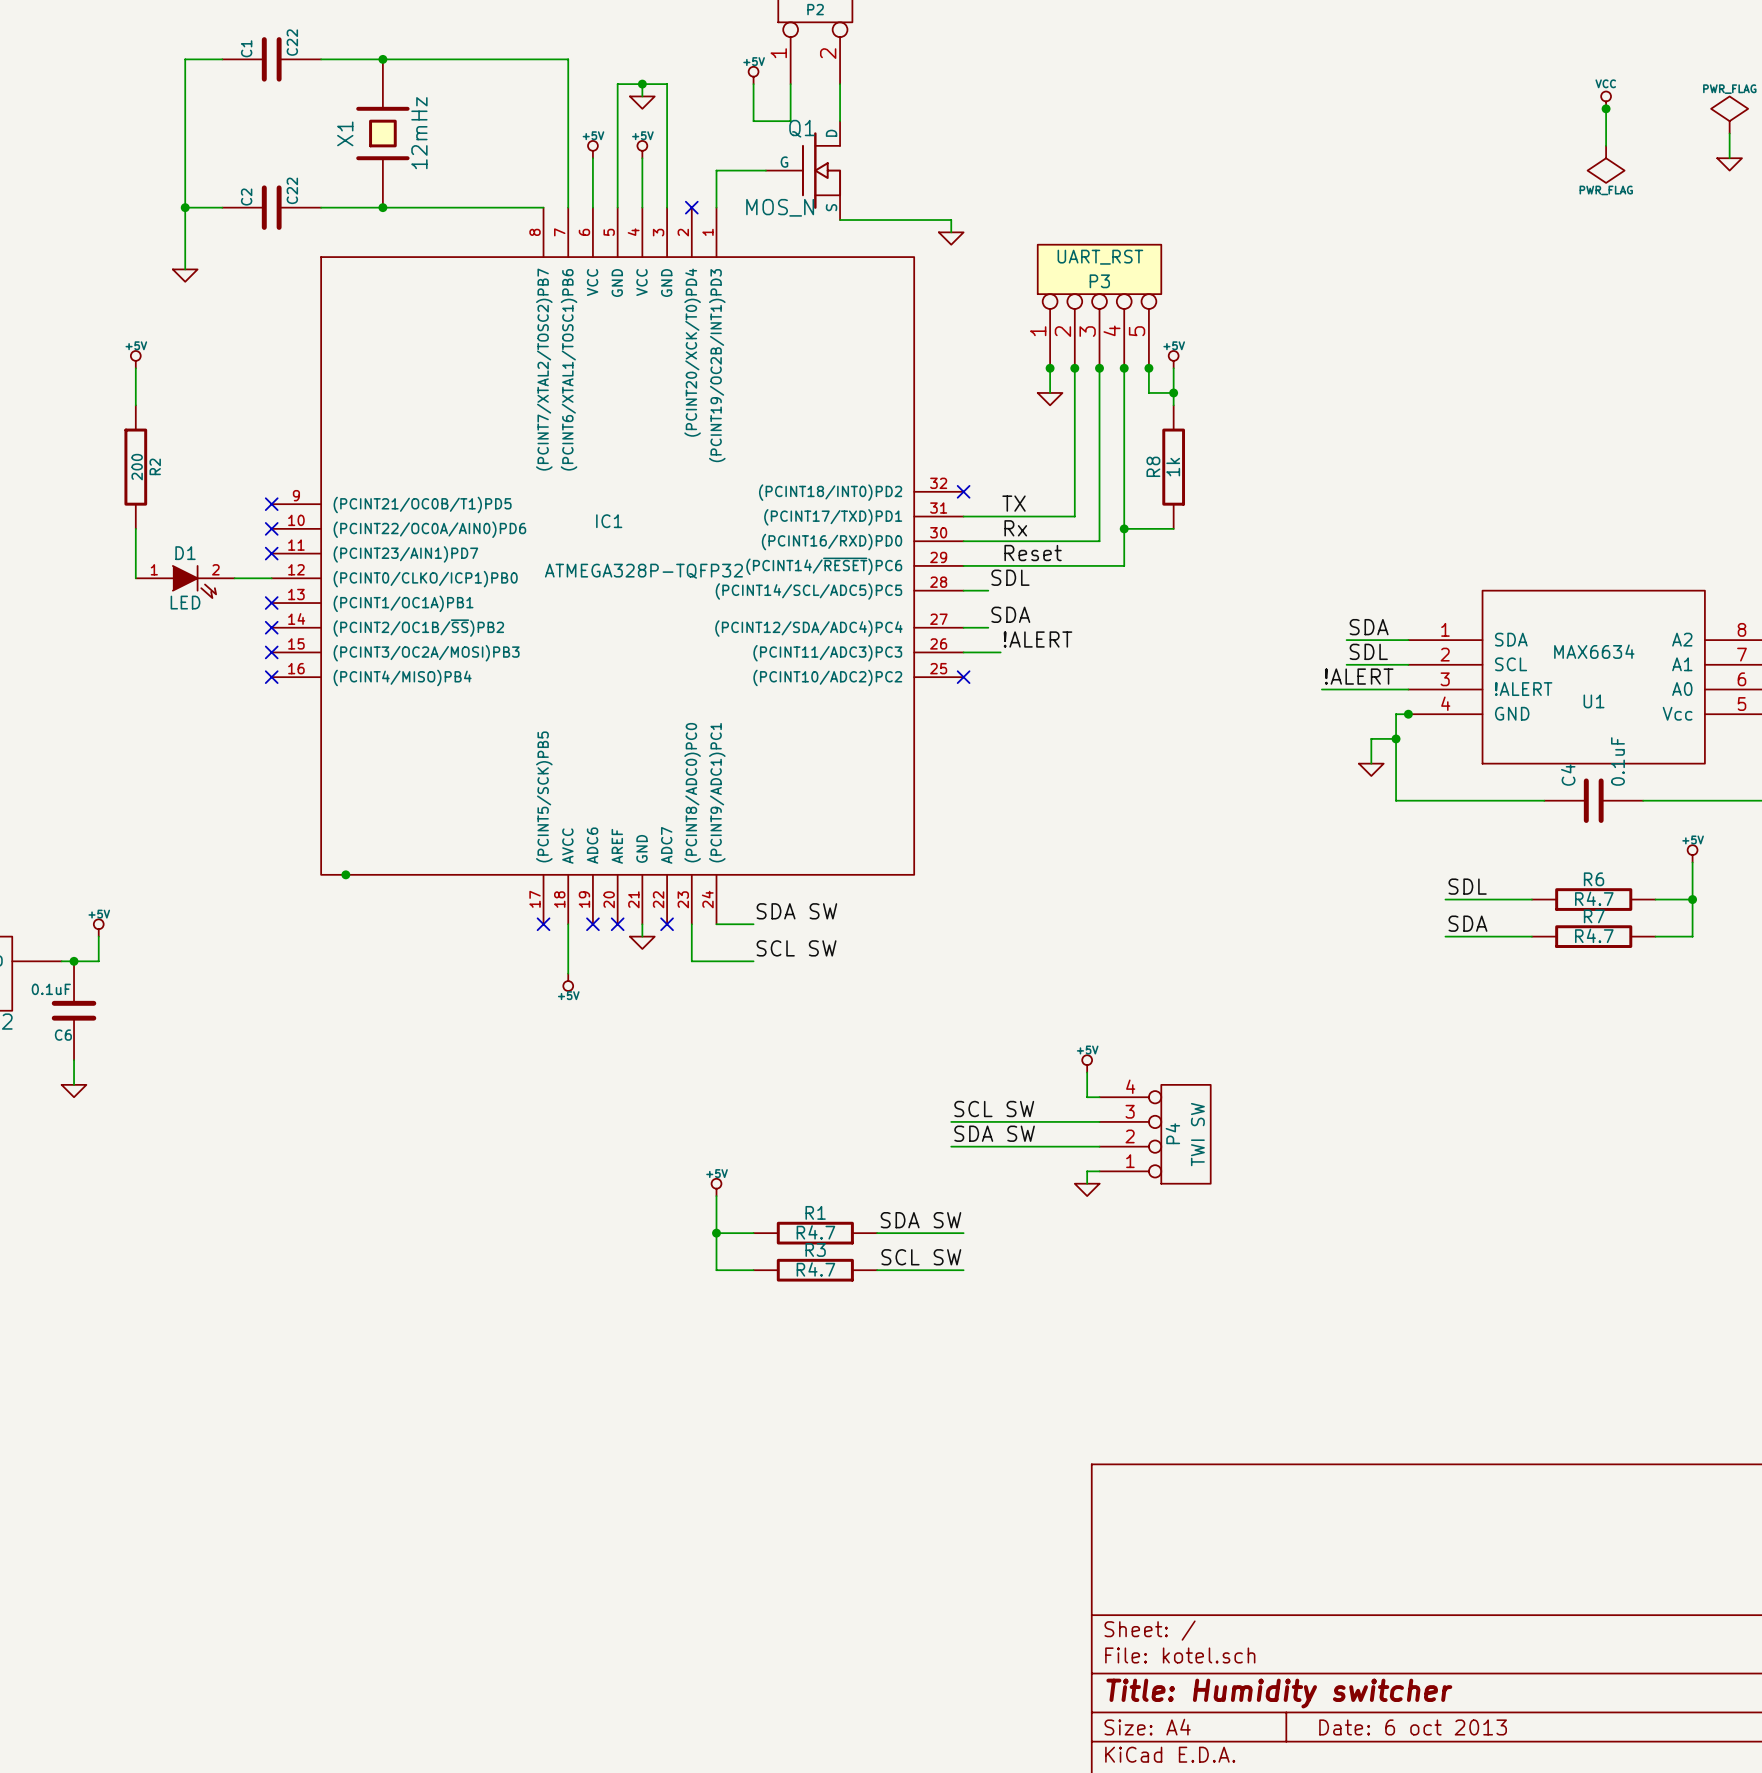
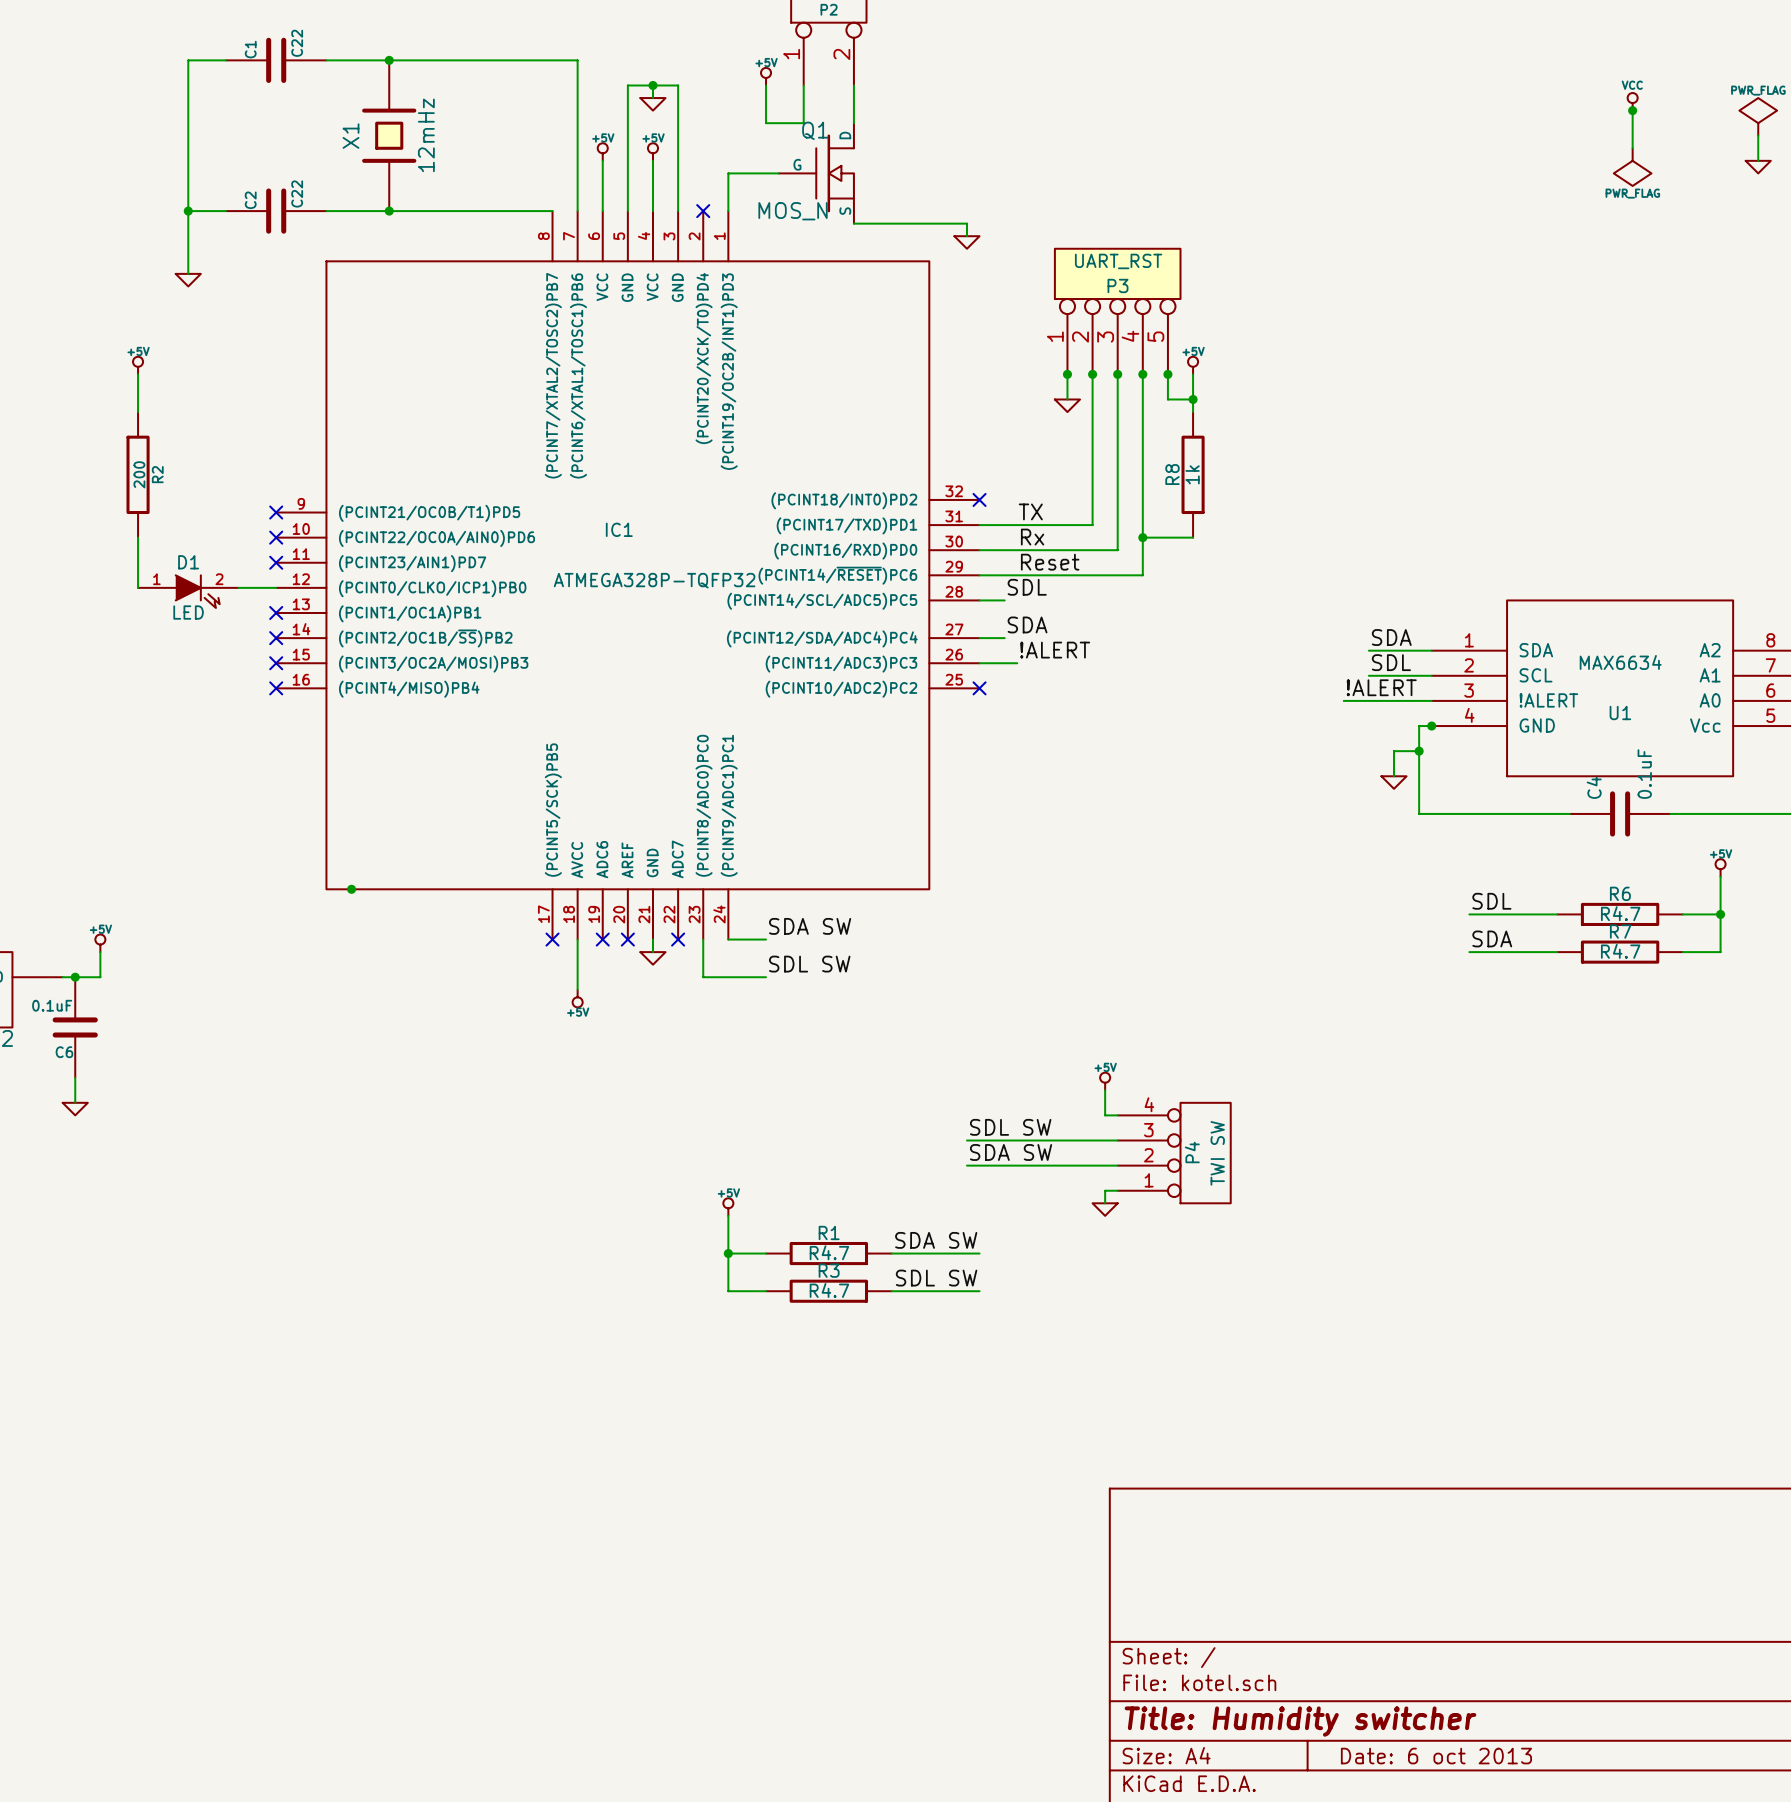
label: SCL SW (796, 948) -> SDL SW (809, 964)
label: SCL SW (994, 1109) -> SDL SW (1010, 1127)
label: SCL SW (921, 1257) -> SDL SW (936, 1278)

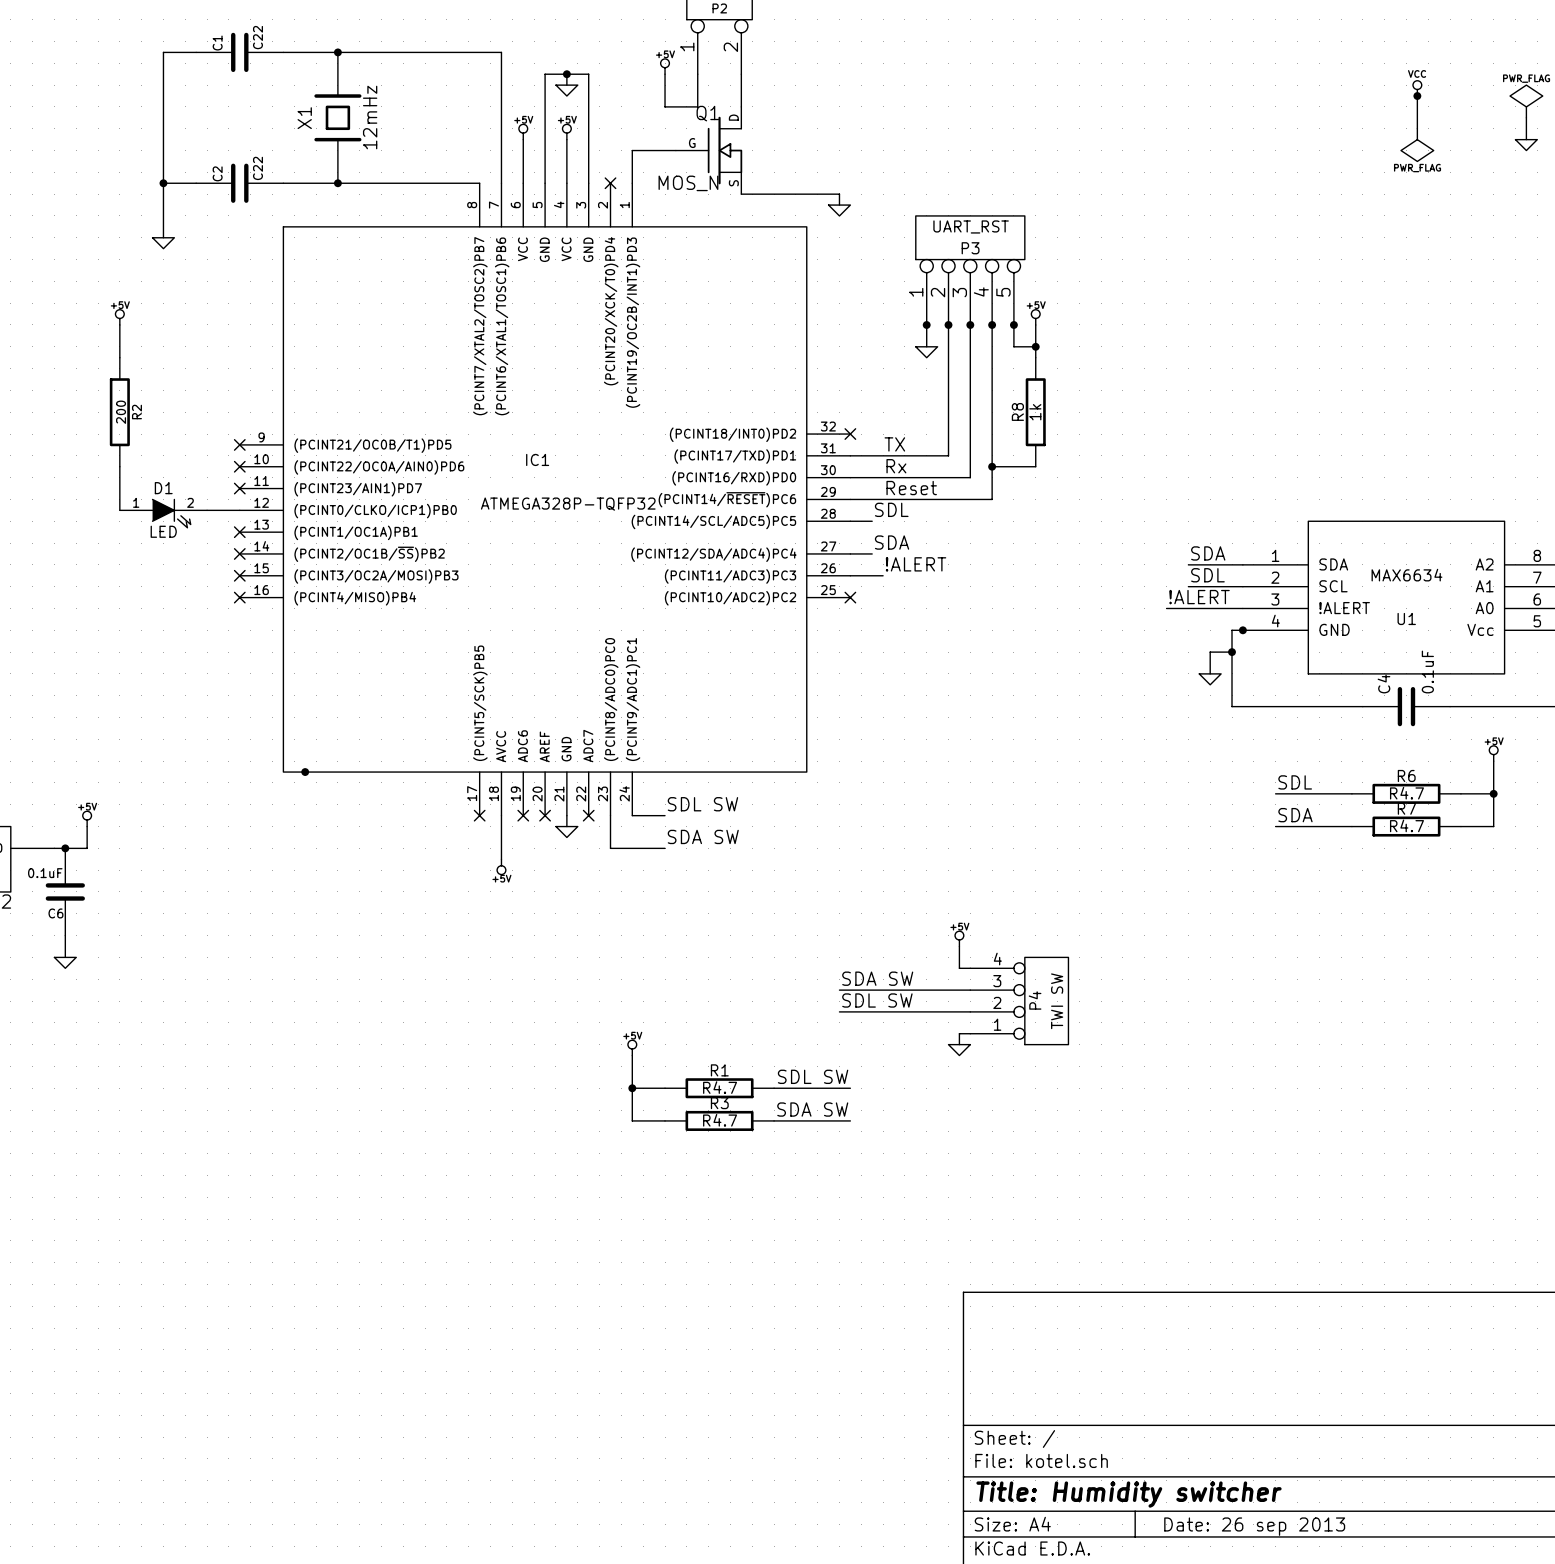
label: SDA SW (810, 926) -> SDL SW (702, 804)
label: SDL SW (809, 964) -> SDA SW (703, 836)
label: SDL SW (1010, 1127) -> SDA SW (877, 978)
label: SDA SW (1011, 1152) -> SDL SW (877, 1000)
label: SDA SW (936, 1240) -> SDL SW (813, 1076)
label: SDL SW (936, 1278) -> SDA SW (812, 1109)
title block: Date: 6 oct 2013 (1436, 1756) -> Date: 26 sep 2013 (1254, 1526)

